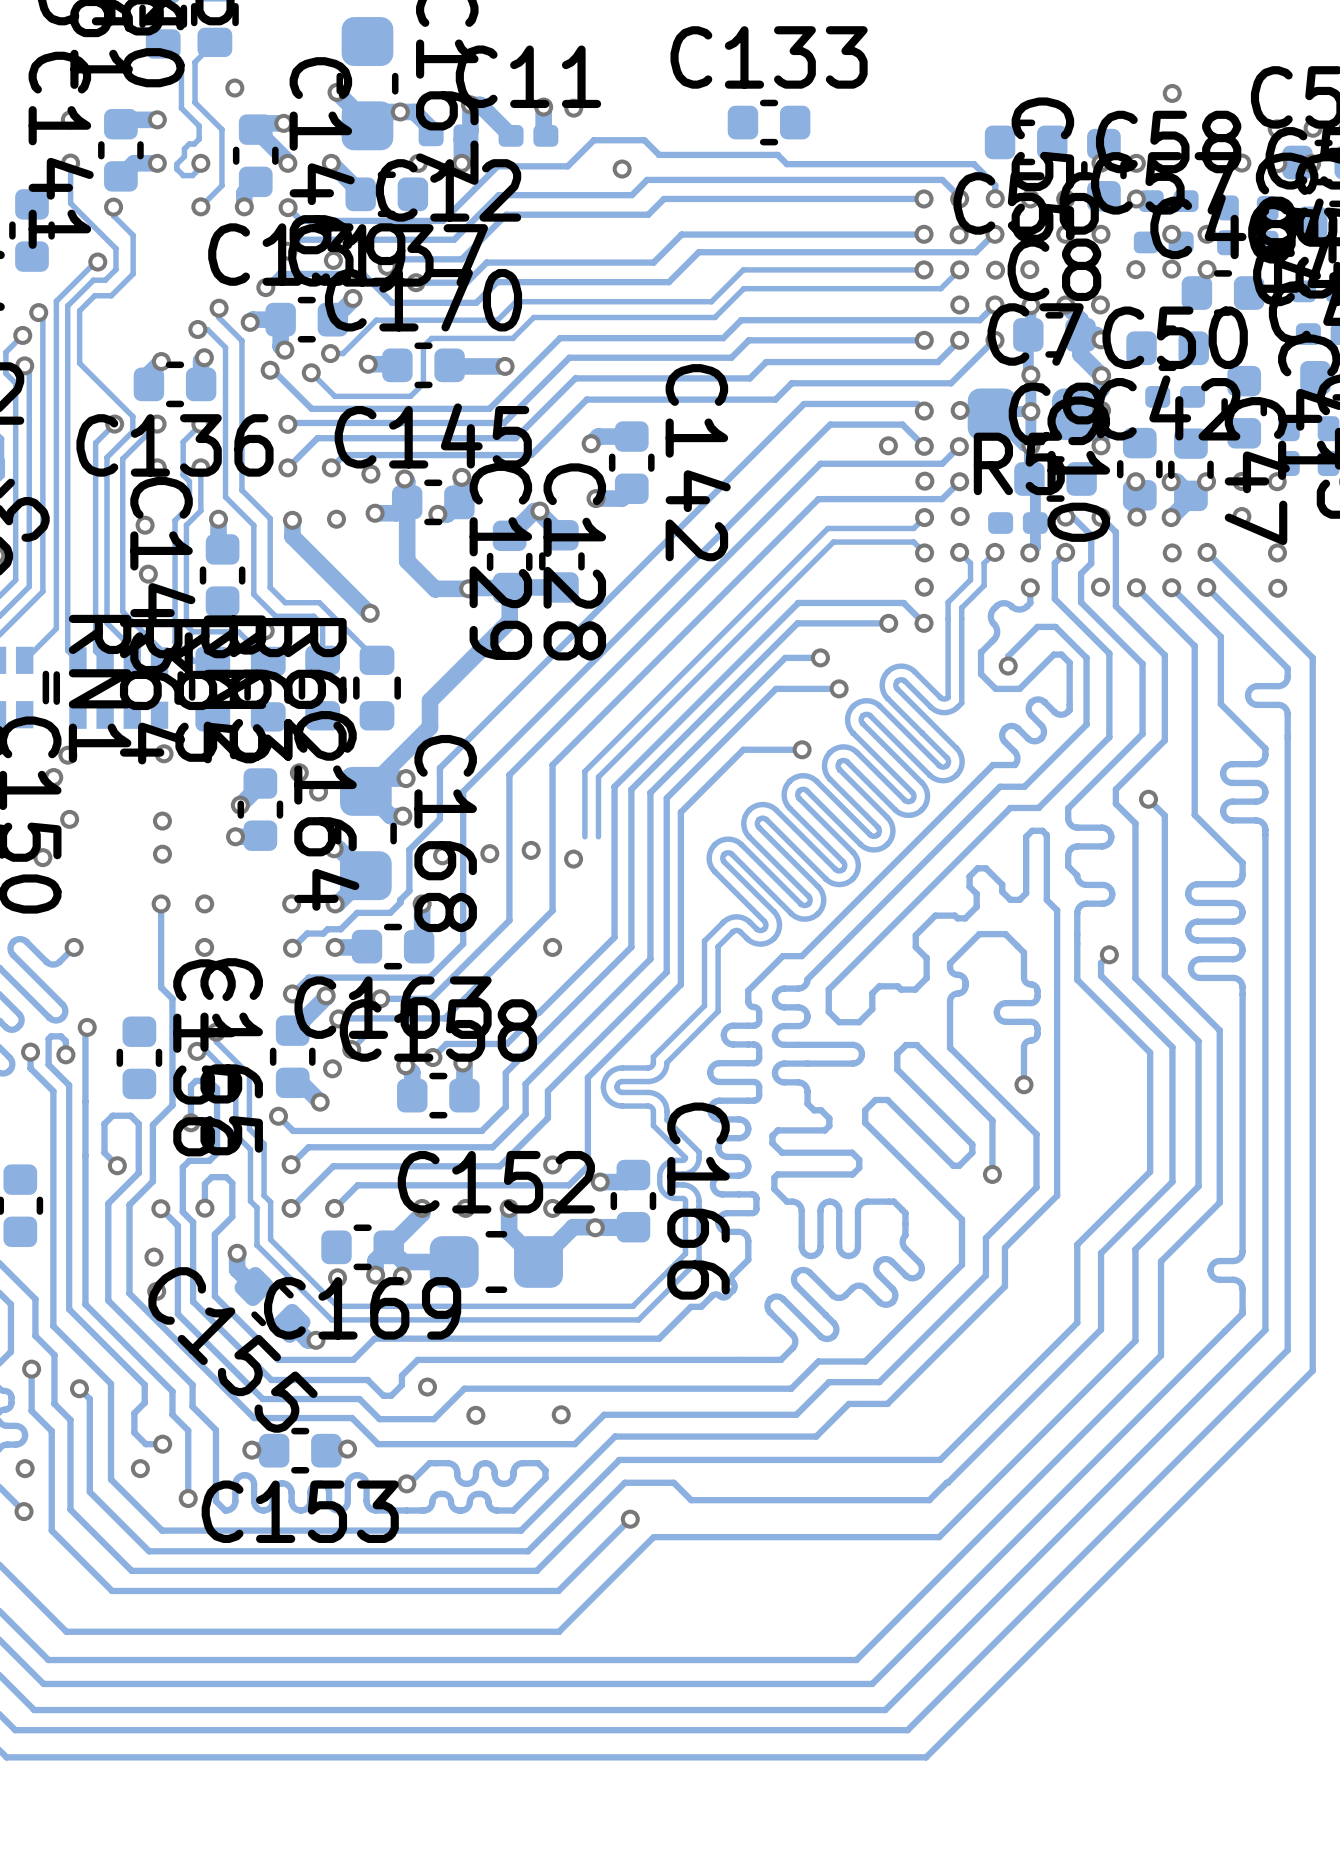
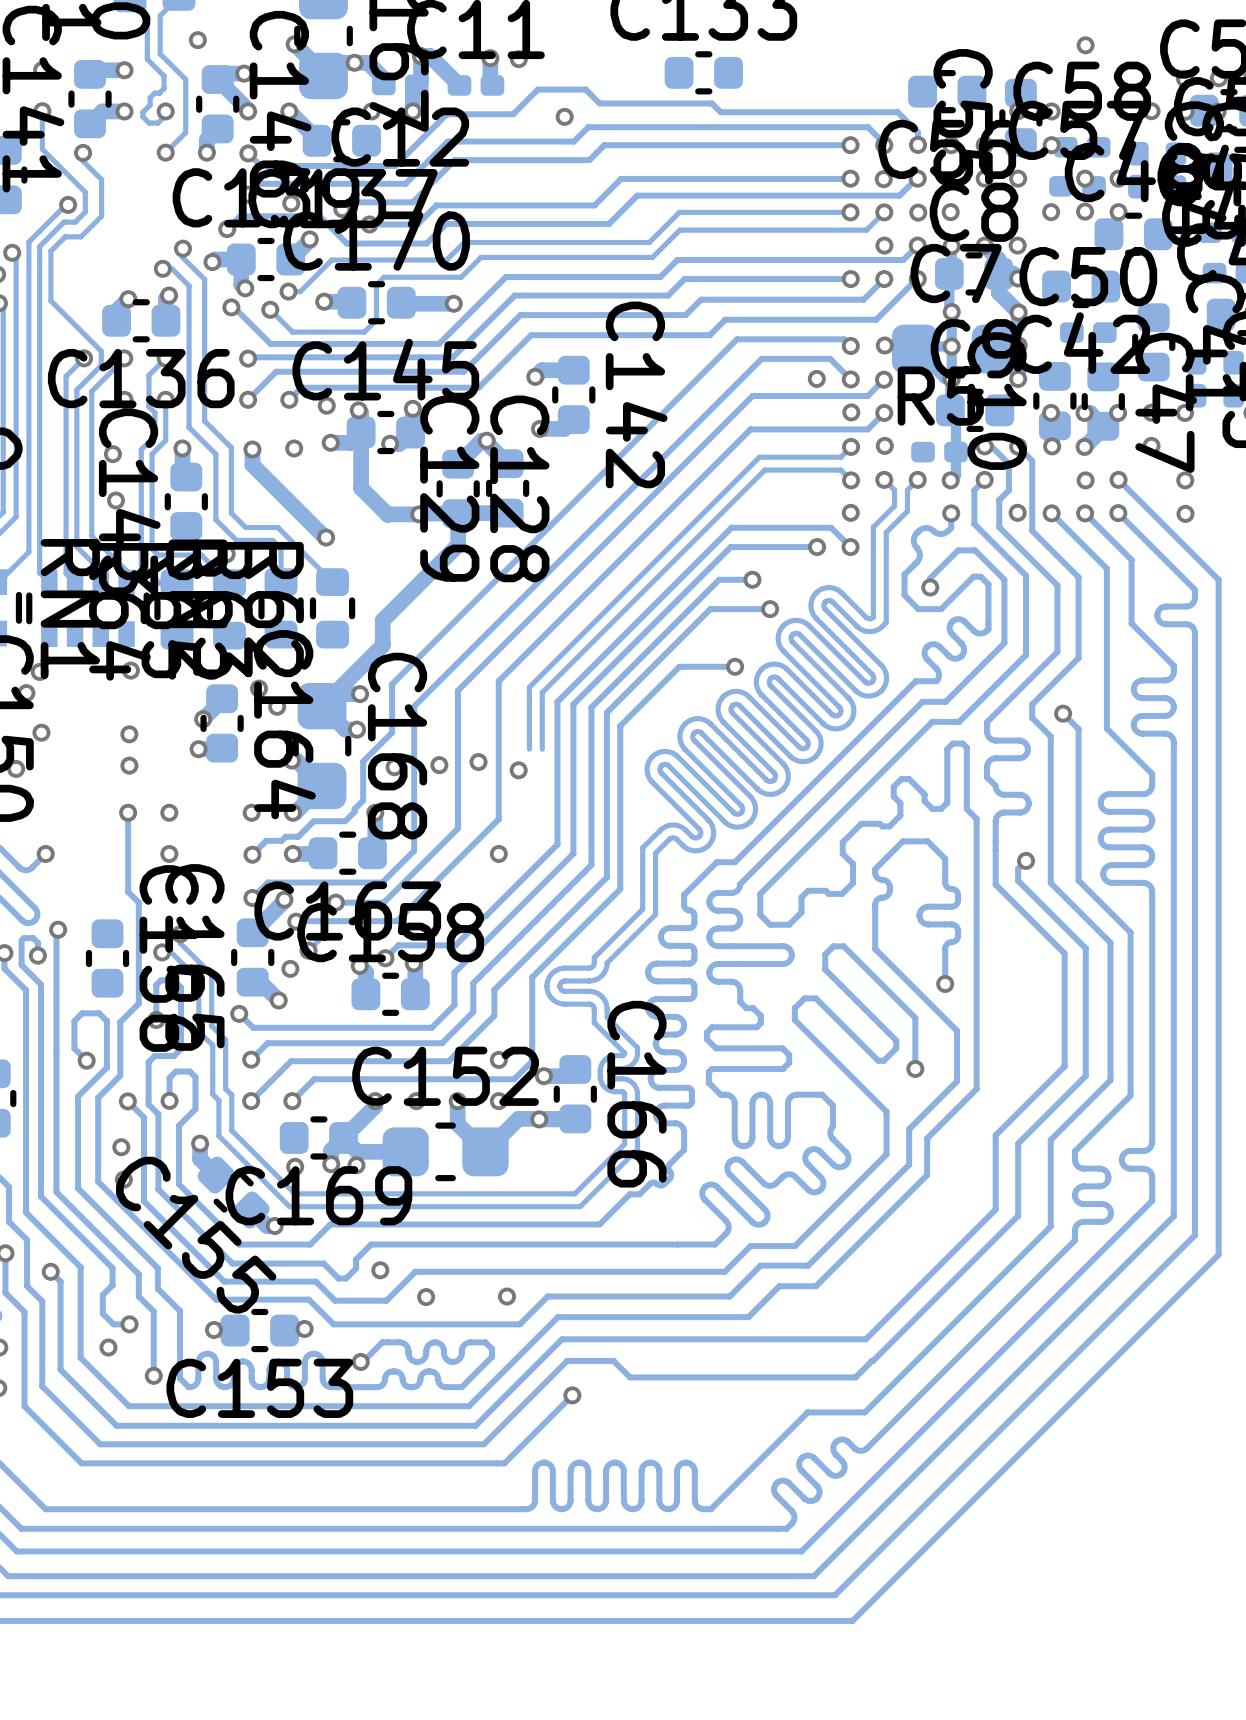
track: (1161, 1270) (1161, 1345) -> (1074, 1159) (1080, 1167) (1103, 1169) (1108, 1177) (1102, 1185) (1078, 1188) (1075, 1194) (1076, 1200) (1082, 1204) (1105, 1204) (1111, 1212) (1109, 1218) (1104, 1221) (1080, 1222) (1074, 1230)
track: (878, 1537) (653, 1537) (559, 1631) (66, 1631) -> (807, 1412) (710, 1509) (701, 1508) (696, 1504) (694, 1469) (691, 1464) (685, 1462) (680, 1464) (677, 1469) (676, 1503) (668, 1509) (660, 1503) (659, 1469) (655, 1464) (650, 1462) (645, 1464) (641, 1469) (640, 1503) (632, 1509) (624, 1503) (623, 1469) (620, 1464) (614, 1462) (606, 1468) (605, 1502) (598, 1509) (592, 1508) (589, 1503) (588, 1469) (584, 1464) (579, 1462) (571, 1468) (570, 1502) (562, 1509) (557, 1508) (553, 1503) (552, 1469) (549, 1464) (543, 1462) (535, 1468) (534, 1502) (527, 1509) (45, 1509) (38, 1502)
track: (941, 1575) (862, 1654) -> (867, 1448) (857, 1450) (844, 1439) (835, 1442) (833, 1451) (842, 1461) (844, 1467) (842, 1473) (836, 1475) (830, 1474) (811, 1456) (806, 1455) (801, 1458) (799, 1463) (799, 1468) (819, 1489) (818, 1496) (813, 1500) (805, 1499) (786, 1481) (780, 1480) (776, 1483) (774, 1492) (793, 1512) (794, 1518) (791, 1523)

